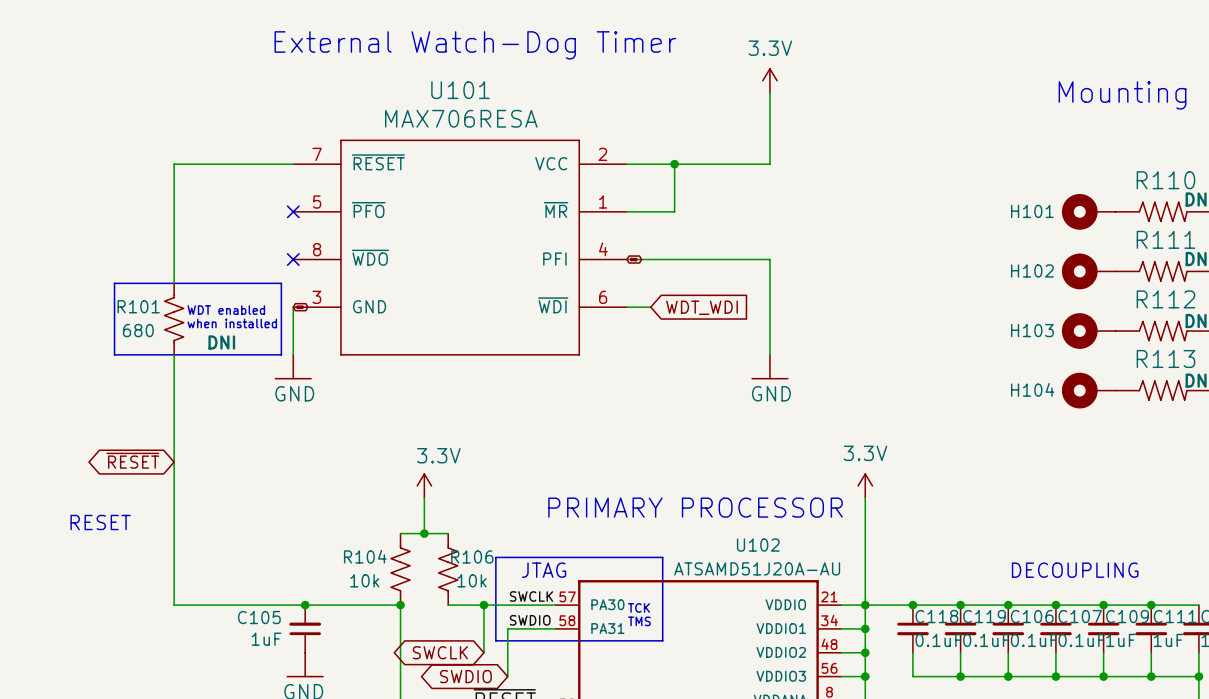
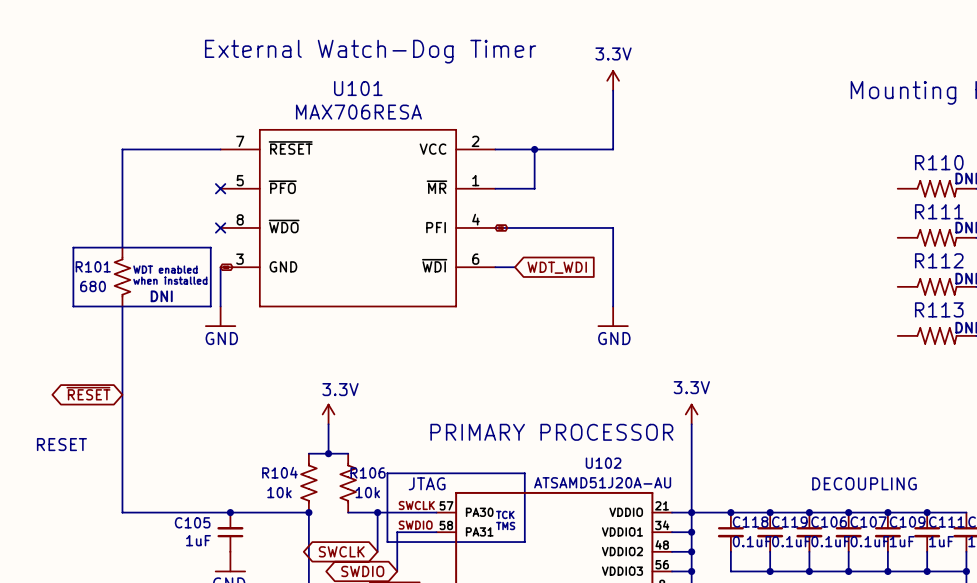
H101: (1088, 211) -> none
H102: (1088, 271) -> none
H103: (1088, 331) -> none
H104: (1088, 390) -> none

